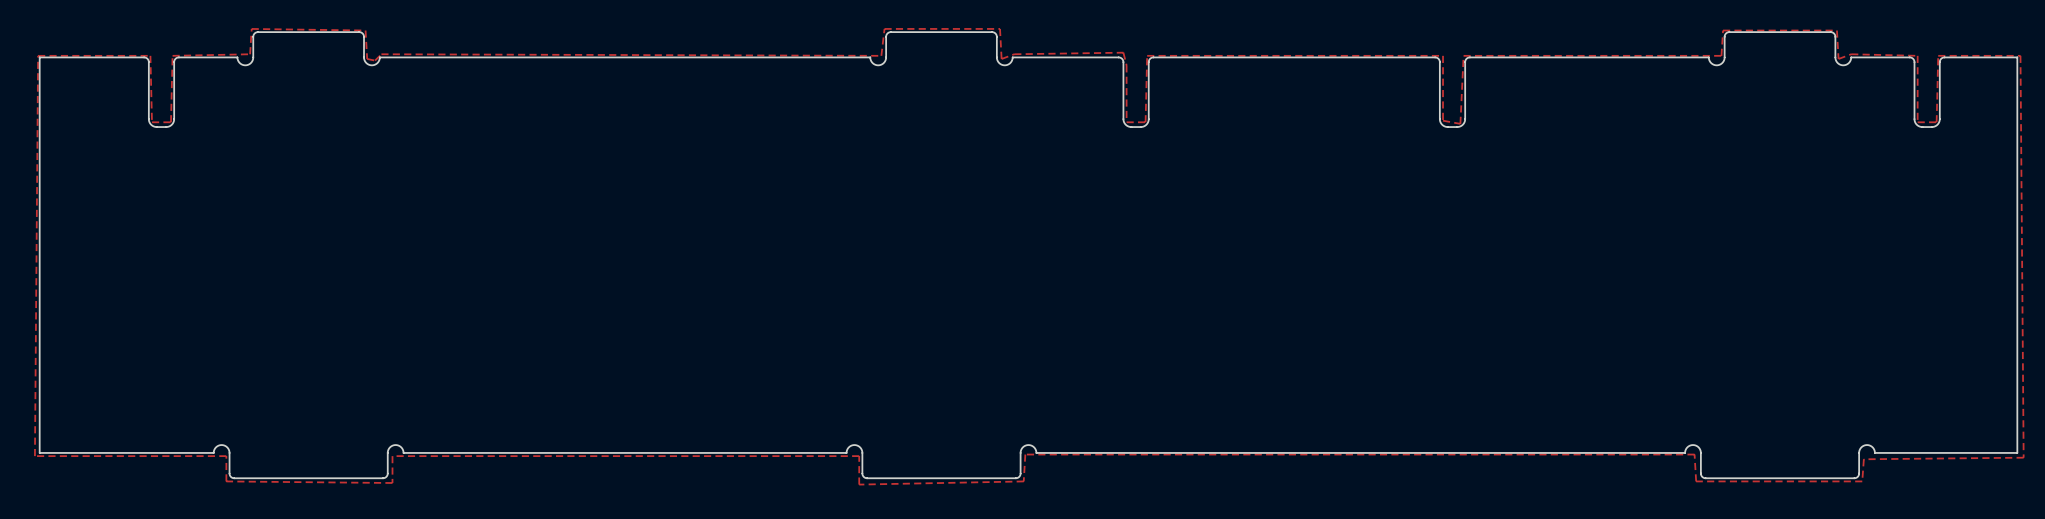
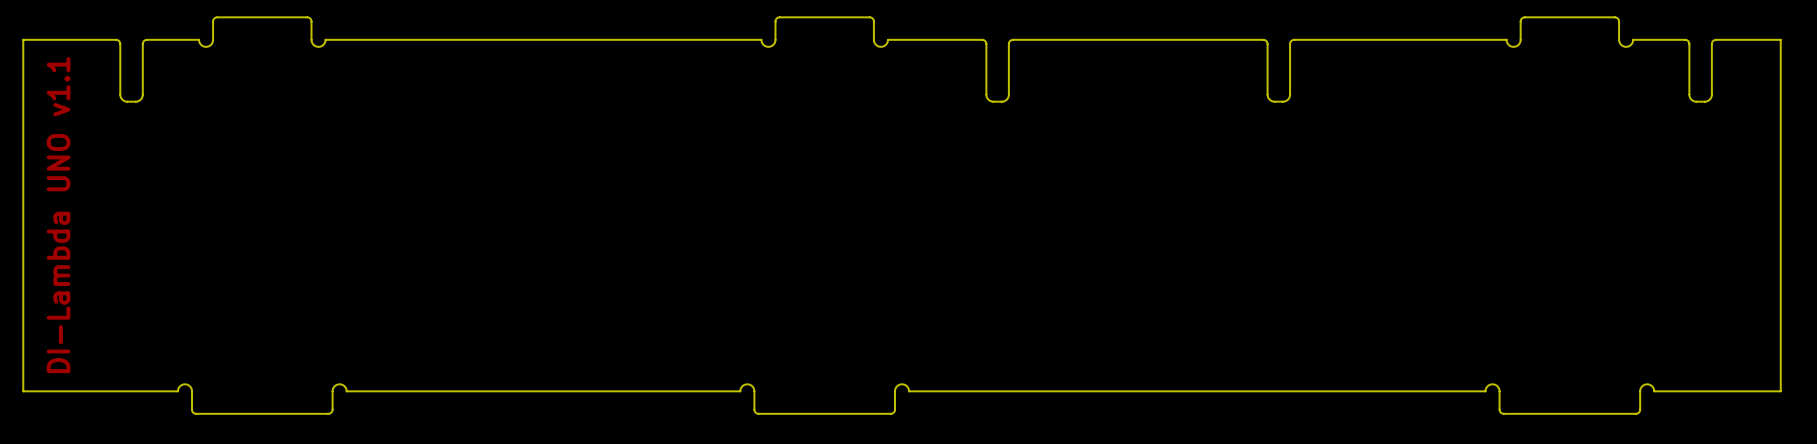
zone outline: (251, 28) (250, 54) (172, 55) (171, 122) (152, 122) (150, 55) (38, 55) (34, 456) (226, 456) (226, 481) (392, 483) (392, 456) (859, 456) (859, 484) (1023, 481) (1025, 454) (1694, 454) (1696, 481) (1862, 481) (1863, 459) (2023, 457) (2020, 55) (1938, 55) (1936, 122) (1917, 122) (1917, 55) (1851, 54) (1838, 59) (1836, 30) (1723, 30) (1721, 55) (1463, 55) (1460, 123) (1443, 120) (1443, 55) (1147, 55) (1145, 122) (1126, 122) (1126, 65) (1123, 52) (1014, 54) (1001, 59) (1000, 28) (884, 28) (881, 55) (381, 54) (375, 60) (367, 59) (365, 30) (251, 28) -> none
text: none -> DI-Lambda UNO v1.1 (58, 215)

